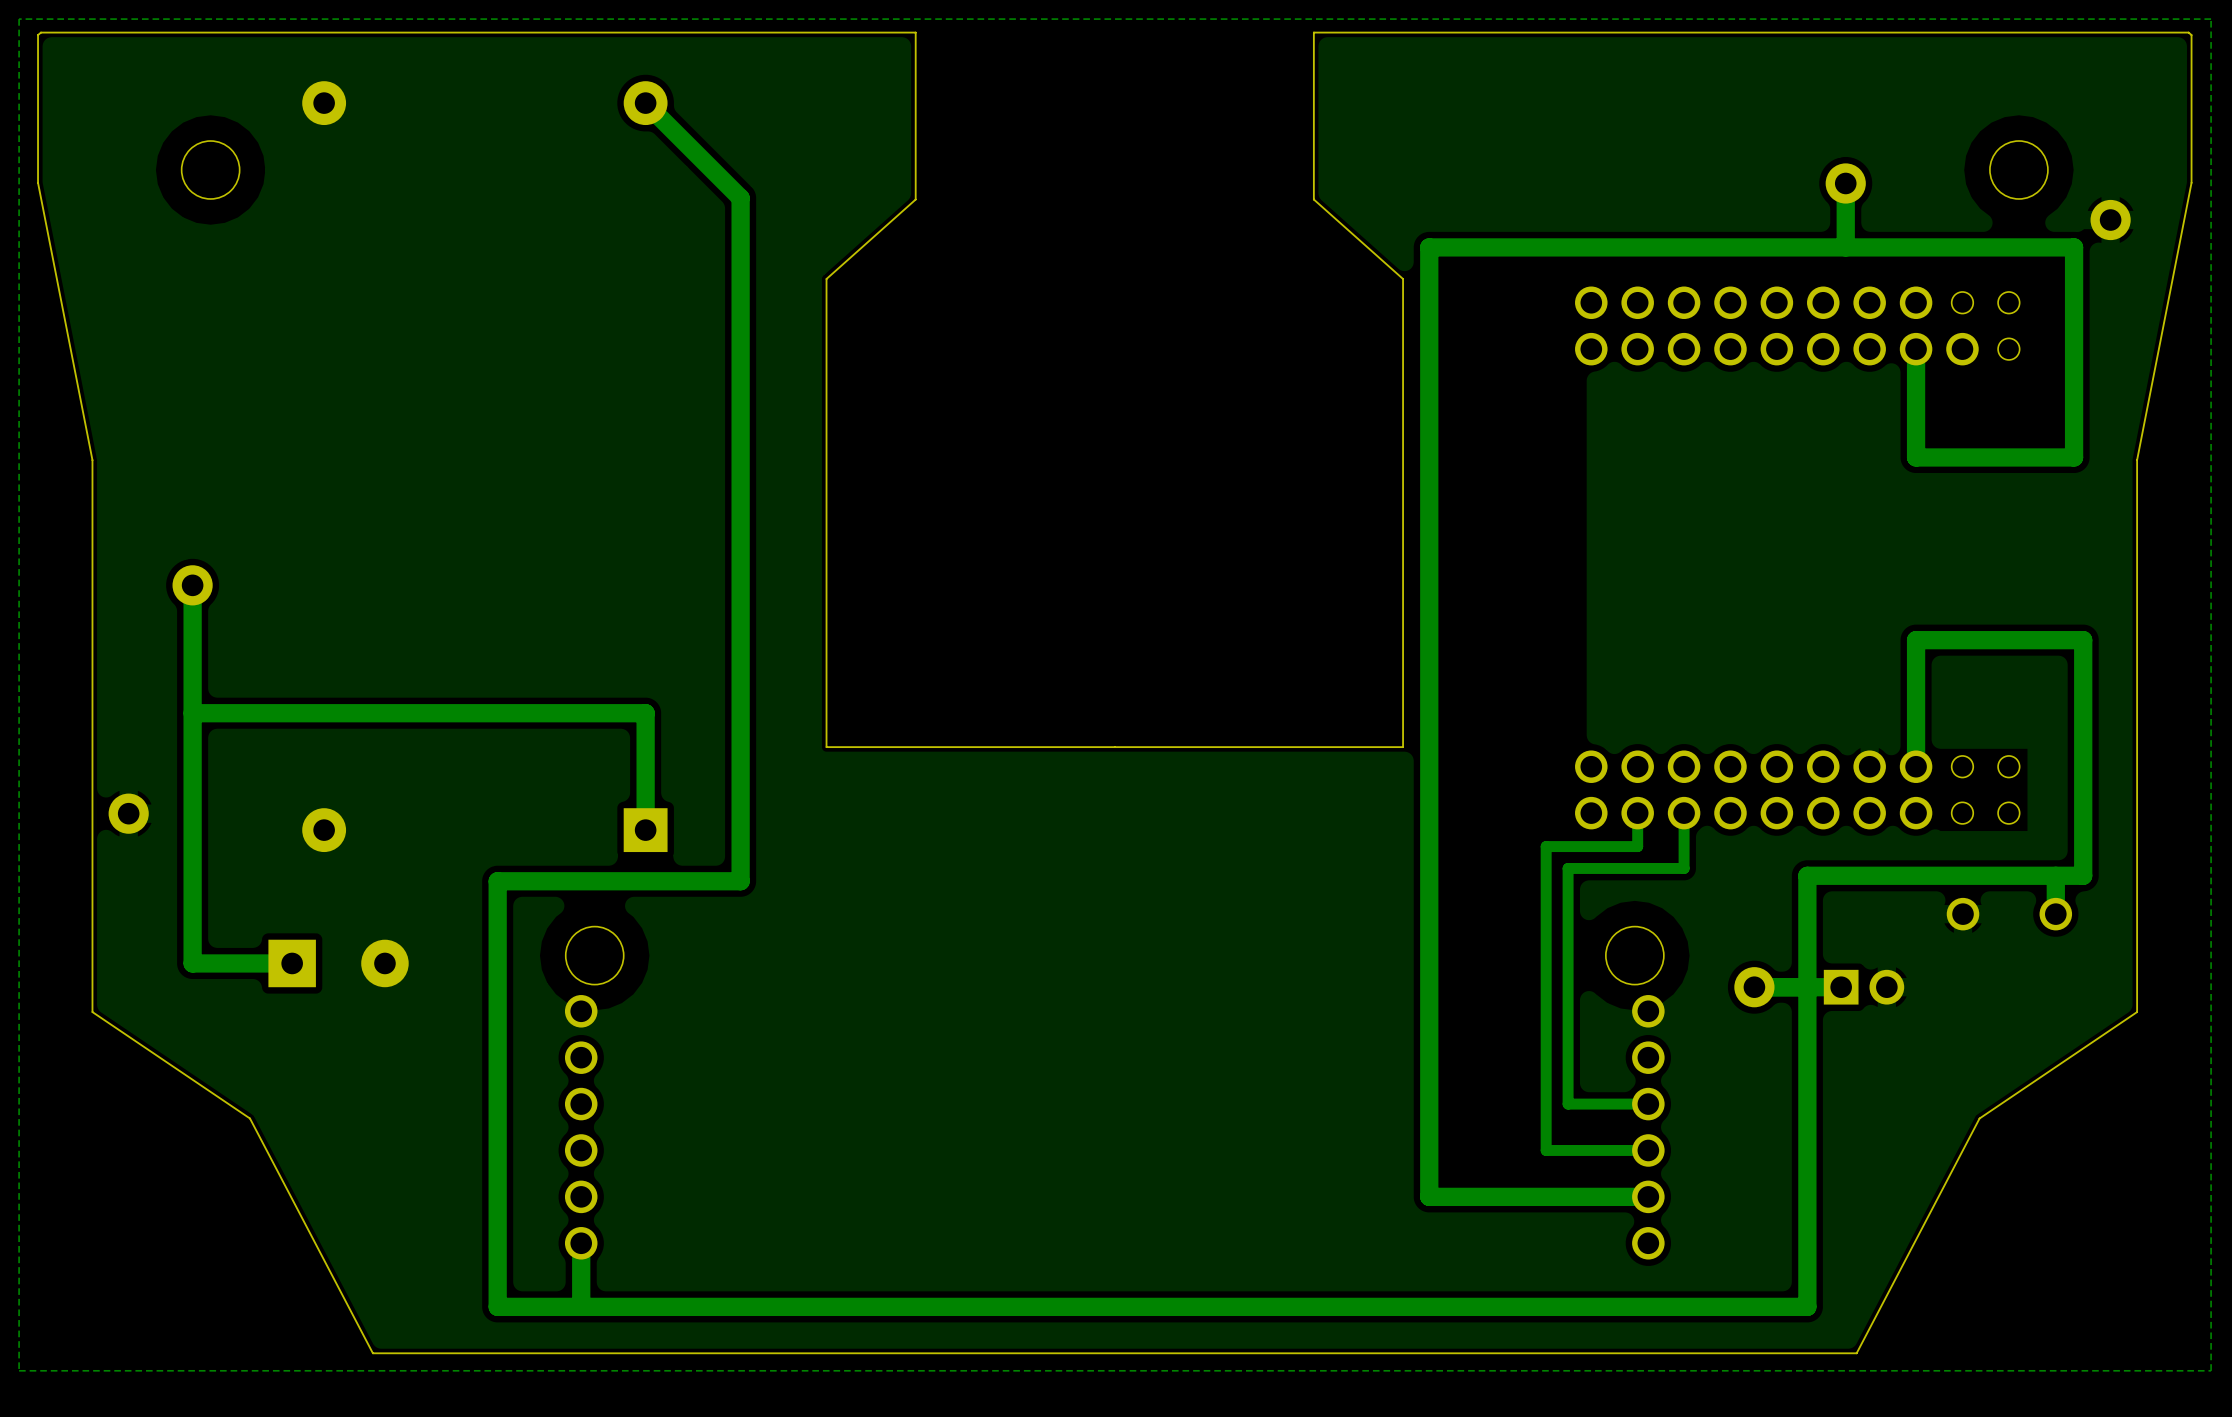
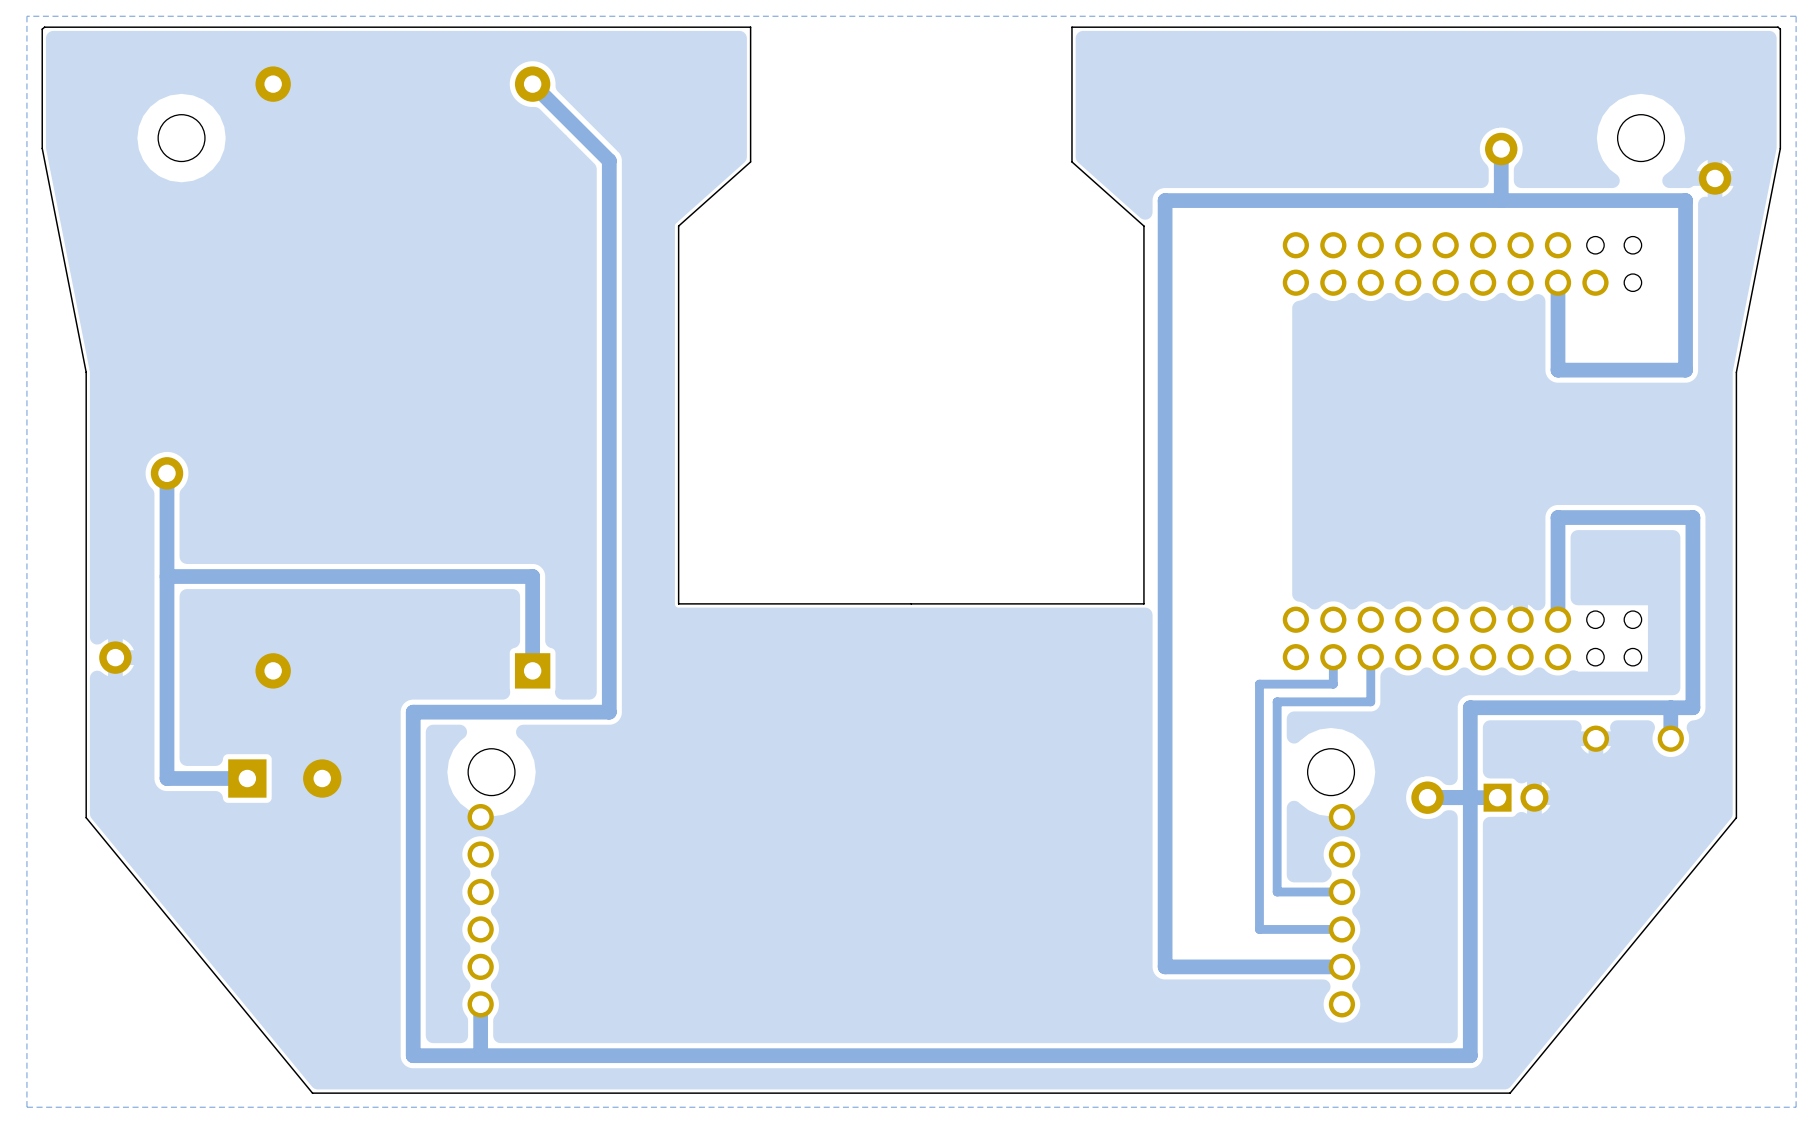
board edge: (92, 1012) (250, 1118) (372, 1353) -> (86, 817) (312, 1093)
board edge: (2137, 1012) (1979, 1118) (1856, 1353) -> (1736, 817) (1510, 1093)

